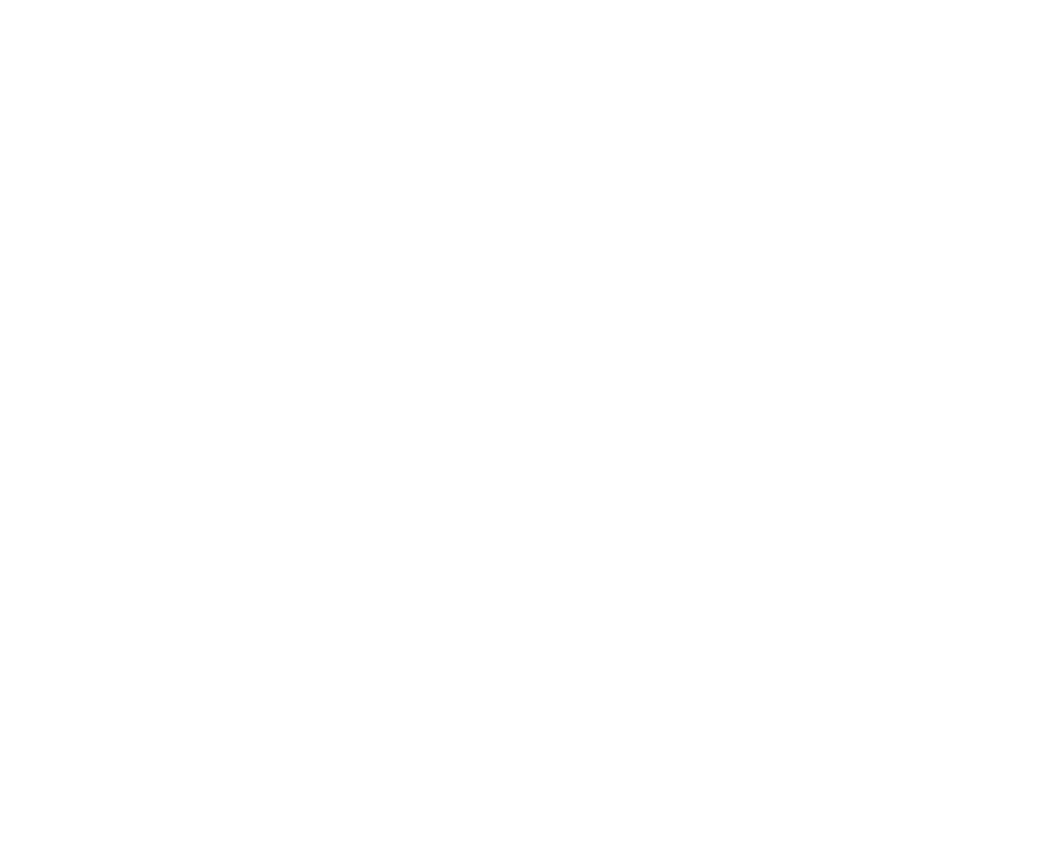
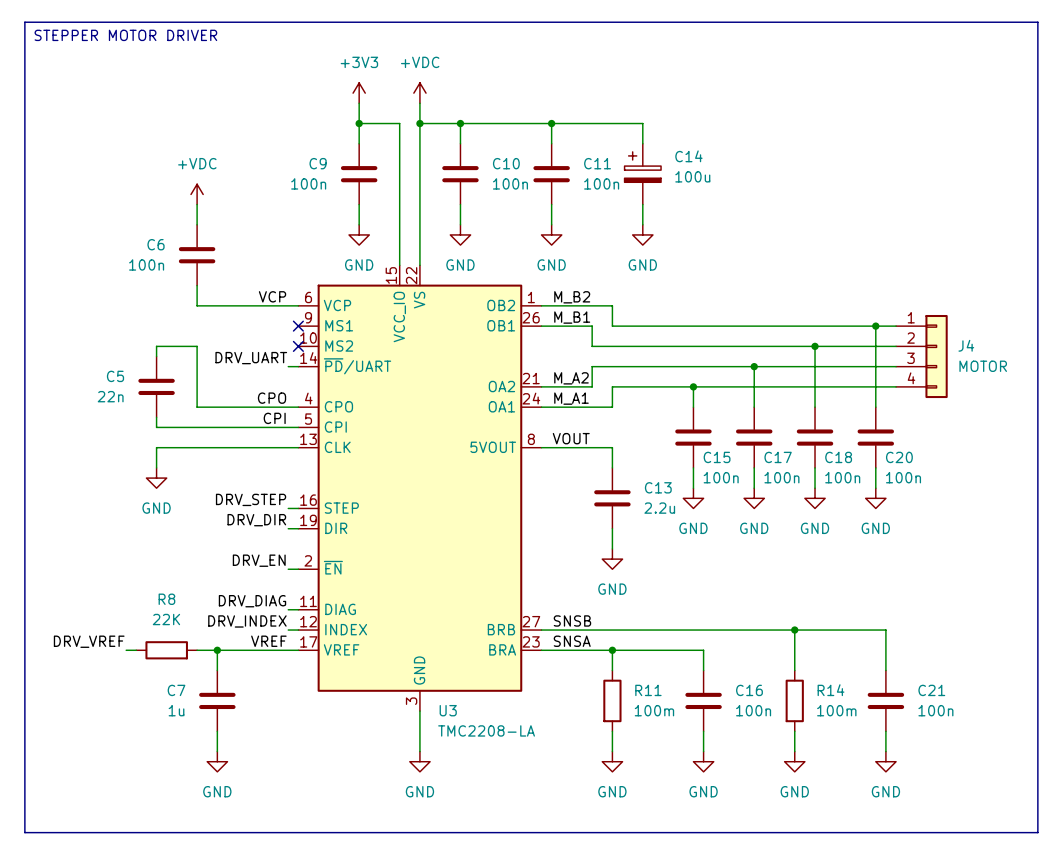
line: none -> (24, 22) (1037, 22) (1037, 832) (24, 832) (24, 22)
text: none -> STEPPER MOTOR DRIVER (125, 35)
power symbol: none -> +3V3 (359, 93)
power symbol: none -> +VDC (419, 93)
wire: none -> (359, 103) (359, 143)
wire: none -> (419, 103) (419, 265)
wire: none -> (359, 123) (399, 123) (399, 265)
junction: none -> (359, 123)
wire: none -> (419, 123) (642, 123) (642, 143)
junction: none -> (419, 123)
wire: none -> (460, 123) (460, 143)
junction: none -> (460, 123)
wire: none -> (551, 123) (551, 143)
junction: none -> (551, 123)
C9: none -> 100n (359, 174)
C10: none -> 100n (460, 174)
C11: none -> 100n (551, 174)
C14: none -> 100u (642, 174)
power symbol: none -> +VDC (197, 194)
wire: none -> (197, 204) (197, 224)
wire: none -> (359, 204) (359, 224)
wire: none -> (460, 204) (460, 224)
wire: none -> (551, 204) (551, 224)
wire: none -> (642, 204) (642, 224)
power symbol: none -> GND (359, 234)
power symbol: none -> GND (460, 234)
power symbol: none -> GND (551, 234)
power symbol: none -> GND (642, 234)
C6: none -> 100n (197, 255)
wire: none -> (197, 285) (197, 305) (298, 305)
label: none -> VCP (272, 296)
label: none -> M_B2 (572, 297)
wire: none -> (541, 305) (612, 305) (612, 326) (896, 326)
label: none -> M_B1 (572, 317)
no-connect mark: none -> (298, 326)
wire: none -> (541, 326) (592, 326) (592, 346) (896, 346)
wire: none -> (875, 326) (875, 407)
junction: none -> (875, 326)
no-connect mark: none -> (298, 346)
wire: none -> (815, 346) (815, 407)
junction: none -> (815, 346)
wire: none -> (156, 356) (156, 346) (197, 346) (197, 407) (298, 407)
J4: none -> MOTOR (921, 356)
label: none -> DRV_UART (251, 358)
wire: none -> (288, 366) (298, 366)
wire: none -> (754, 366) (754, 407)
junction: none -> (754, 366)
wire: none -> (896, 366) (592, 366) (592, 386) (541, 386)
label: none -> M_A2 (571, 378)
C5: none -> 22n (156, 386)
wire: none -> (693, 386) (693, 407)
junction: none -> (693, 386)
wire: none -> (896, 386) (612, 386) (612, 407) (541, 407)
label: none -> CPO (272, 398)
label: none -> M_A1 (571, 398)
wire: none -> (156, 417) (156, 427) (298, 427)
label: none -> CPI (274, 418)
C15: none -> 100n (693, 437)
C17: none -> 100n (754, 437)
C18: none -> 100n (815, 437)
C20: none -> 100n (875, 437)
label: none -> VOUT (571, 438)
wire: none -> (298, 447) (156, 447) (156, 467)
wire: none -> (541, 447) (612, 447) (612, 467)
wire: none -> (693, 467) (693, 488)
wire: none -> (754, 467) (754, 488)
wire: none -> (815, 467) (815, 488)
wire: none -> (875, 467) (875, 488)
power symbol: none -> GND (156, 478)
U3: none -> TMC2208-LA (419, 488)
C13: none -> 2.2u (612, 498)
power symbol: none -> GND (693, 498)
power symbol: none -> GND (754, 498)
power symbol: none -> GND (815, 498)
power symbol: none -> GND (875, 498)
label: none -> DRV_STEP (251, 499)
wire: none -> (288, 508) (298, 508)
label: none -> DRV_DIR (256, 520)
wire: none -> (288, 528) (298, 528)
wire: none -> (612, 528) (612, 548)
power symbol: none -> GND (612, 559)
label: none -> DRV_EN (259, 560)
wire: none -> (288, 569) (298, 569)
label: none -> DRV_DIAG (252, 601)
wire: none -> (288, 609) (298, 609)
label: none -> SNSB (572, 620)
label: none -> DRV_INDEX (247, 621)
wire: none -> (288, 630) (298, 630)
wire: none -> (541, 630) (885, 630) (885, 670)
wire: none -> (794, 630) (794, 670)
junction: none -> (794, 630)
label: none -> DRV_VREF (89, 641)
label: none -> VREF (268, 641)
label: none -> SNSA (572, 641)
wire: none -> (126, 650) (136, 650)
R8: none -> 22K (166, 650)
wire: none -> (197, 650) (298, 650)
wire: none -> (217, 650) (217, 670)
junction: none -> (217, 650)
wire: none -> (541, 650) (703, 650) (703, 670)
wire: none -> (612, 650) (612, 670)
junction: none -> (612, 650)
C7: none -> 1u (217, 700)
R11: none -> 100m (612, 700)
C16: none -> 100n (703, 700)
R14: none -> 100m (794, 700)
C21: none -> 100n (885, 700)
wire: none -> (419, 711) (419, 751)
wire: none -> (217, 731) (217, 751)
wire: none -> (612, 731) (612, 751)
wire: none -> (703, 731) (703, 751)
wire: none -> (794, 731) (794, 751)
wire: none -> (885, 731) (885, 751)
power symbol: none -> GND (217, 761)
power symbol: none -> GND (419, 761)
power symbol: none -> GND (612, 761)
power symbol: none -> GND (703, 761)
power symbol: none -> GND (794, 761)
power symbol: none -> GND (885, 761)

